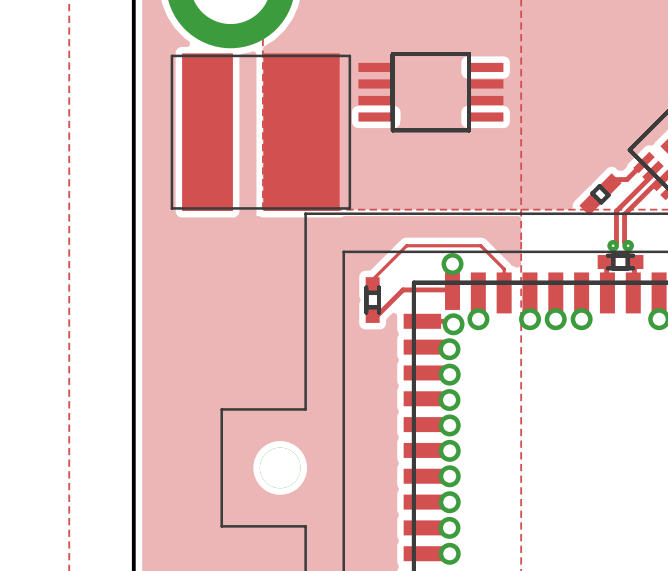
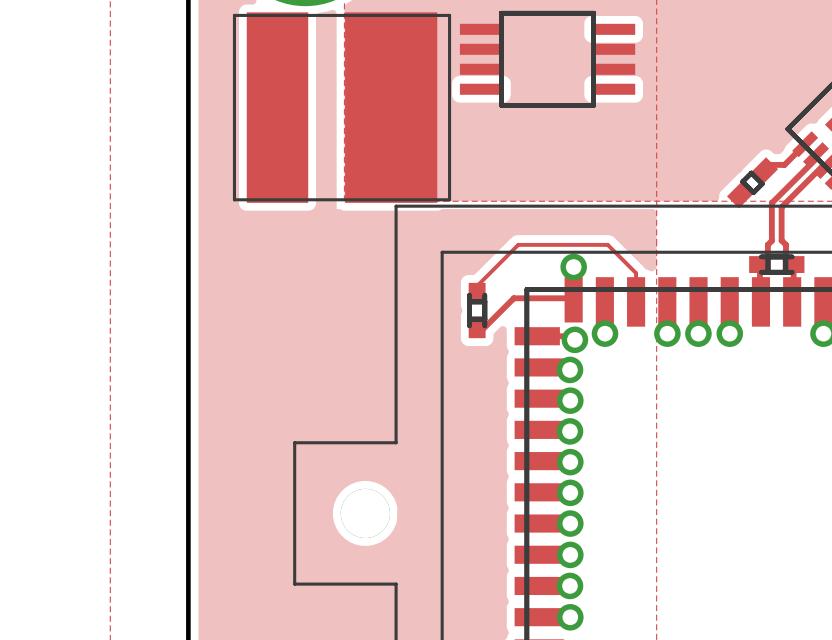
via: (613, 245) -> none
via: (628, 245) -> none

